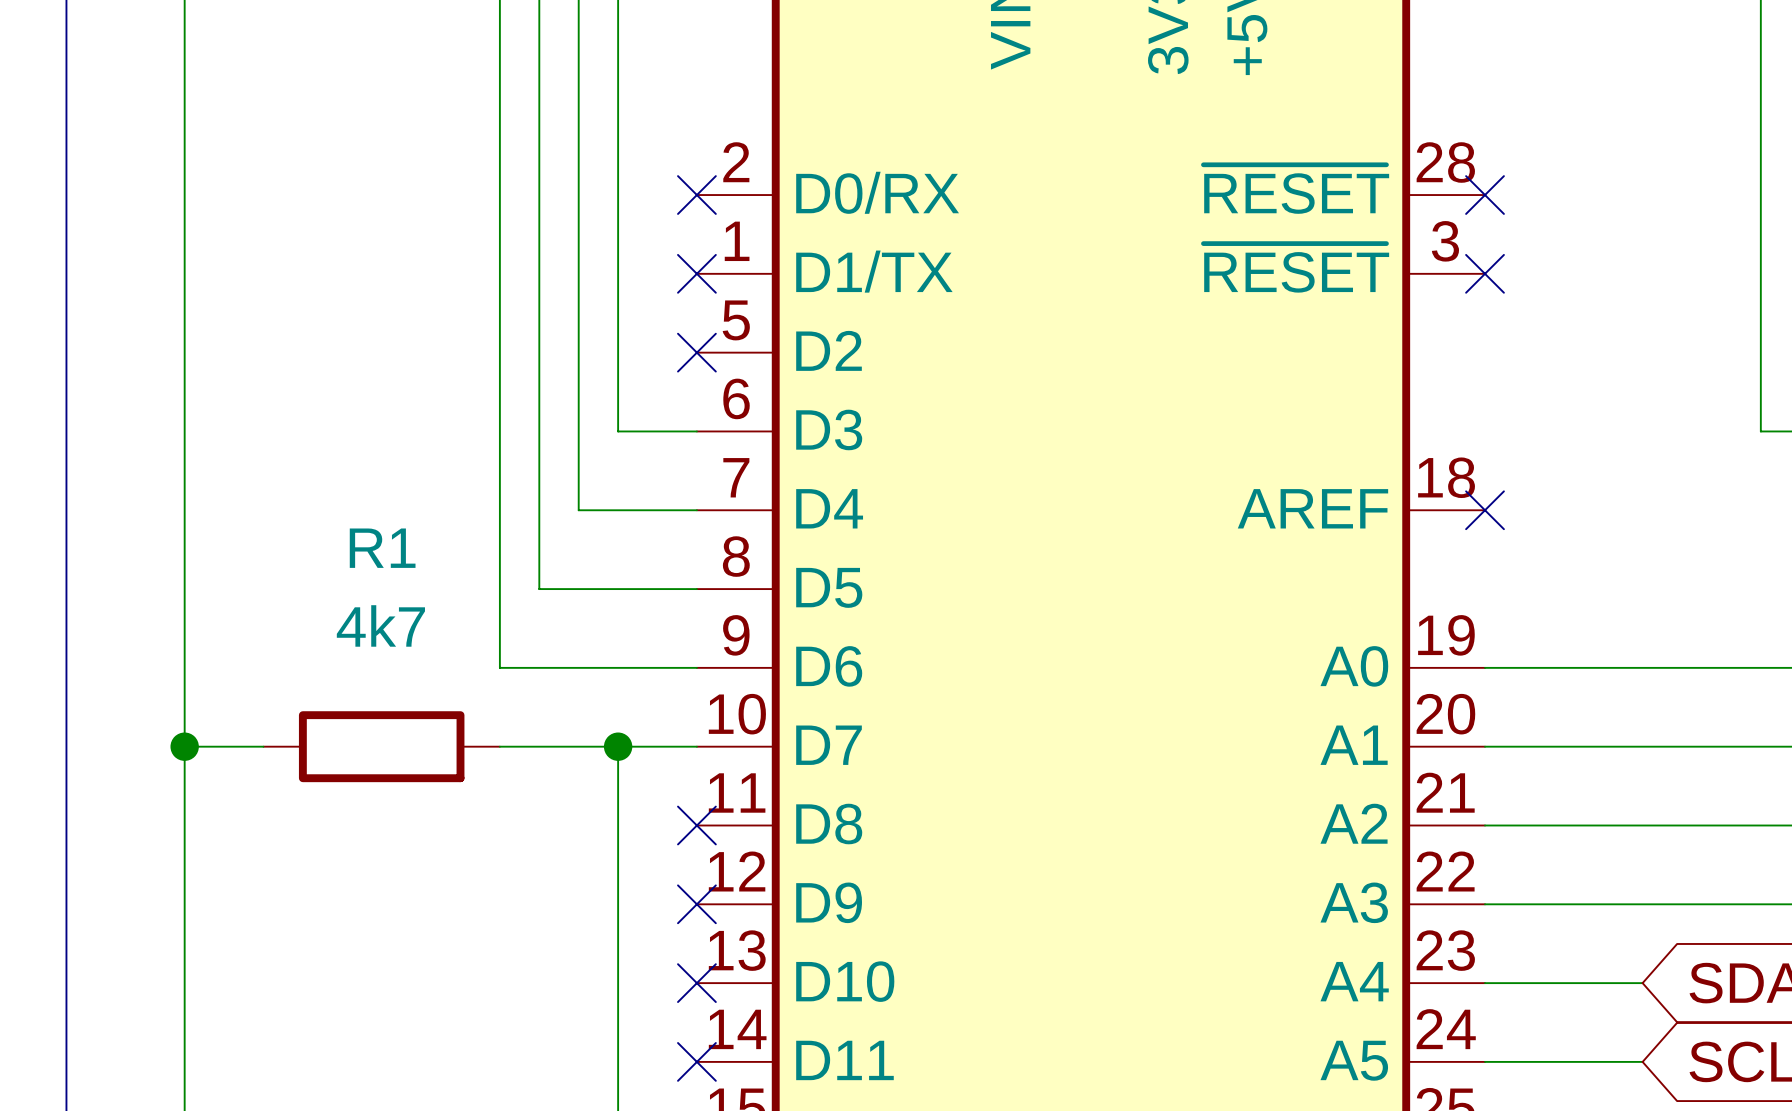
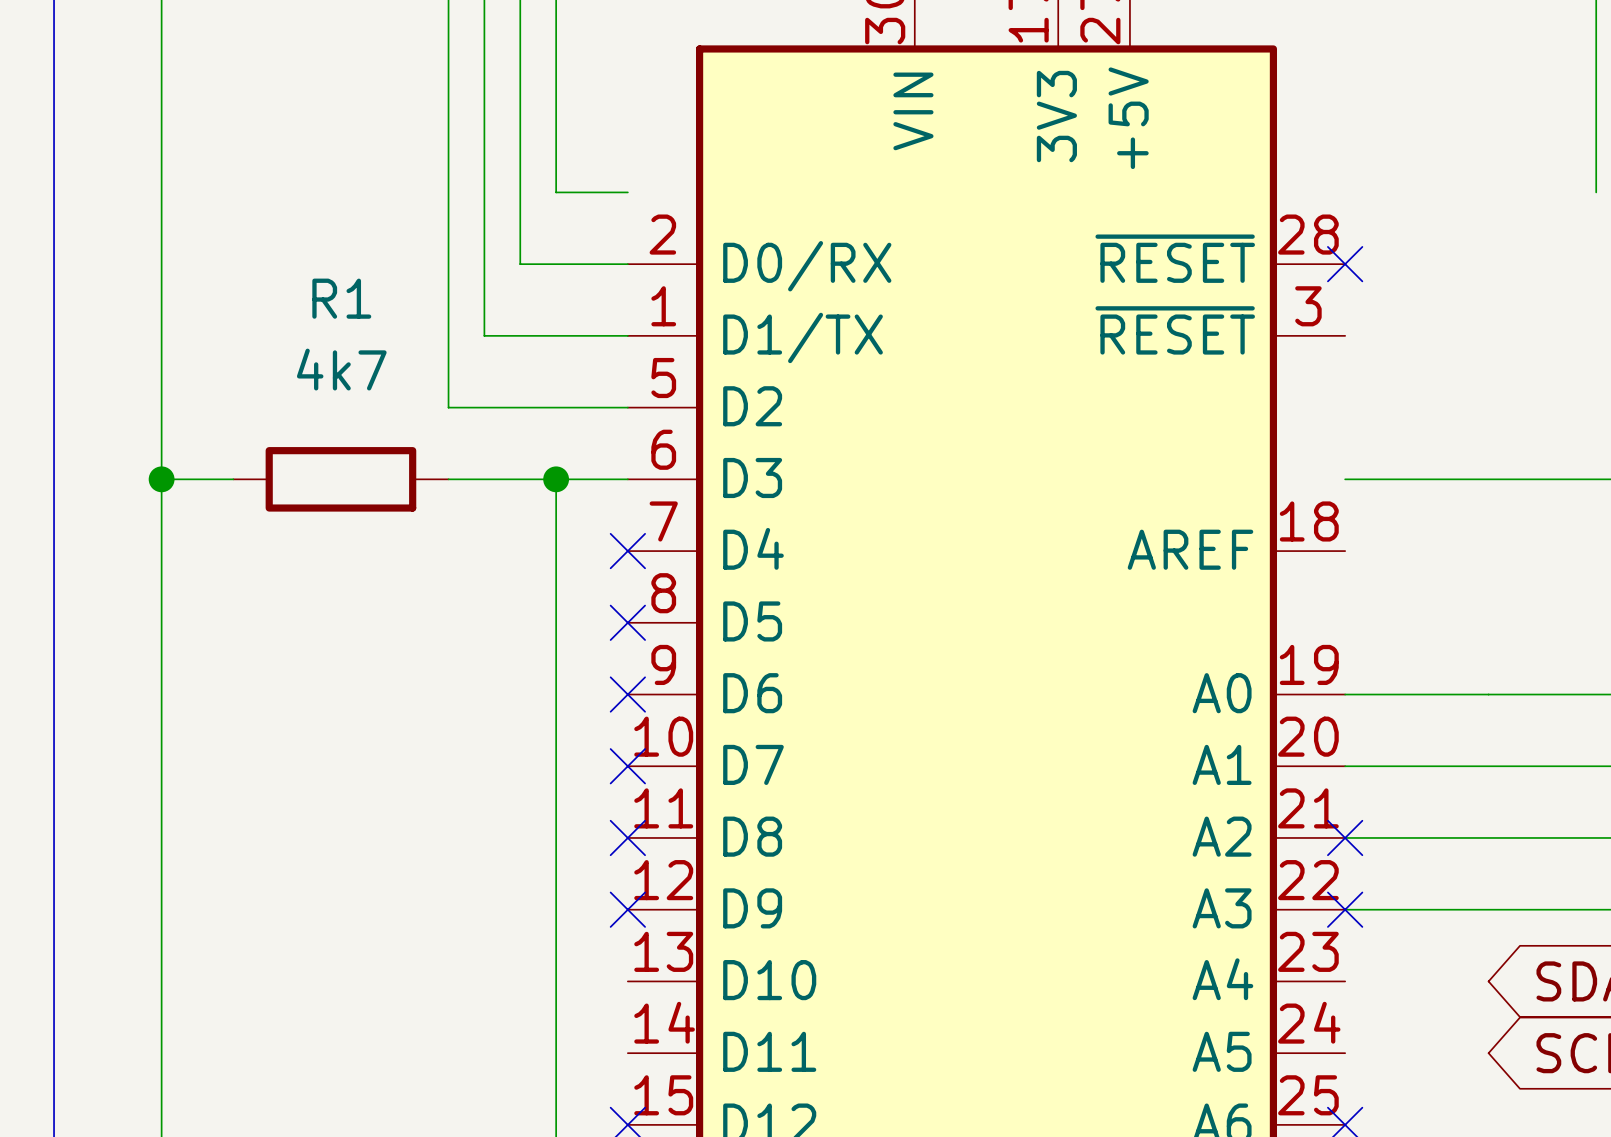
wire: (618, 116) (618, 431) -> (556, 192) (627, 192)
wire: (1760, 116) (1760, 431) -> (1345, 479) (1596, 479)
wire: (578, 195) (578, 510) (696, 510) -> (520, 264) (627, 264)
no-connect mark: (696, 195) -> none
wire: (539, 273) (539, 589) (696, 589) -> (484, 335) (627, 335)
no-connect mark: (696, 273) -> none
no-connect mark: (1485, 273) -> none
wire: (499, 352) (499, 667) (696, 667) -> (448, 407) (627, 407)
no-connect mark: (696, 352) -> none
junction: none -> (161, 479)
wire: none -> (448, 479) (556, 479) (556, 766)
junction: none -> (556, 479)
no-connect mark: none -> (627, 551)
no-connect mark: (1485, 510) -> none
no-connect mark: none -> (627, 622)
no-connect mark: none -> (627, 694)
wire: (184, 746) (263, 746) -> (161, 479) (233, 479)
junction: (184, 746) -> none
R1 position: (381, 746) -> (340, 479)
wire: (499, 746) (696, 746) -> none
junction: (618, 746) -> none
no-connect mark: none -> (627, 766)
no-connect mark: none -> (1345, 837)
no-connect mark: none -> (1345, 909)
no-connect mark: (696, 983) -> none
wire: (1485, 983) (1642, 983) -> none
no-connect mark: (696, 1061) -> none
wire: (1485, 1061) (1642, 1061) -> none

